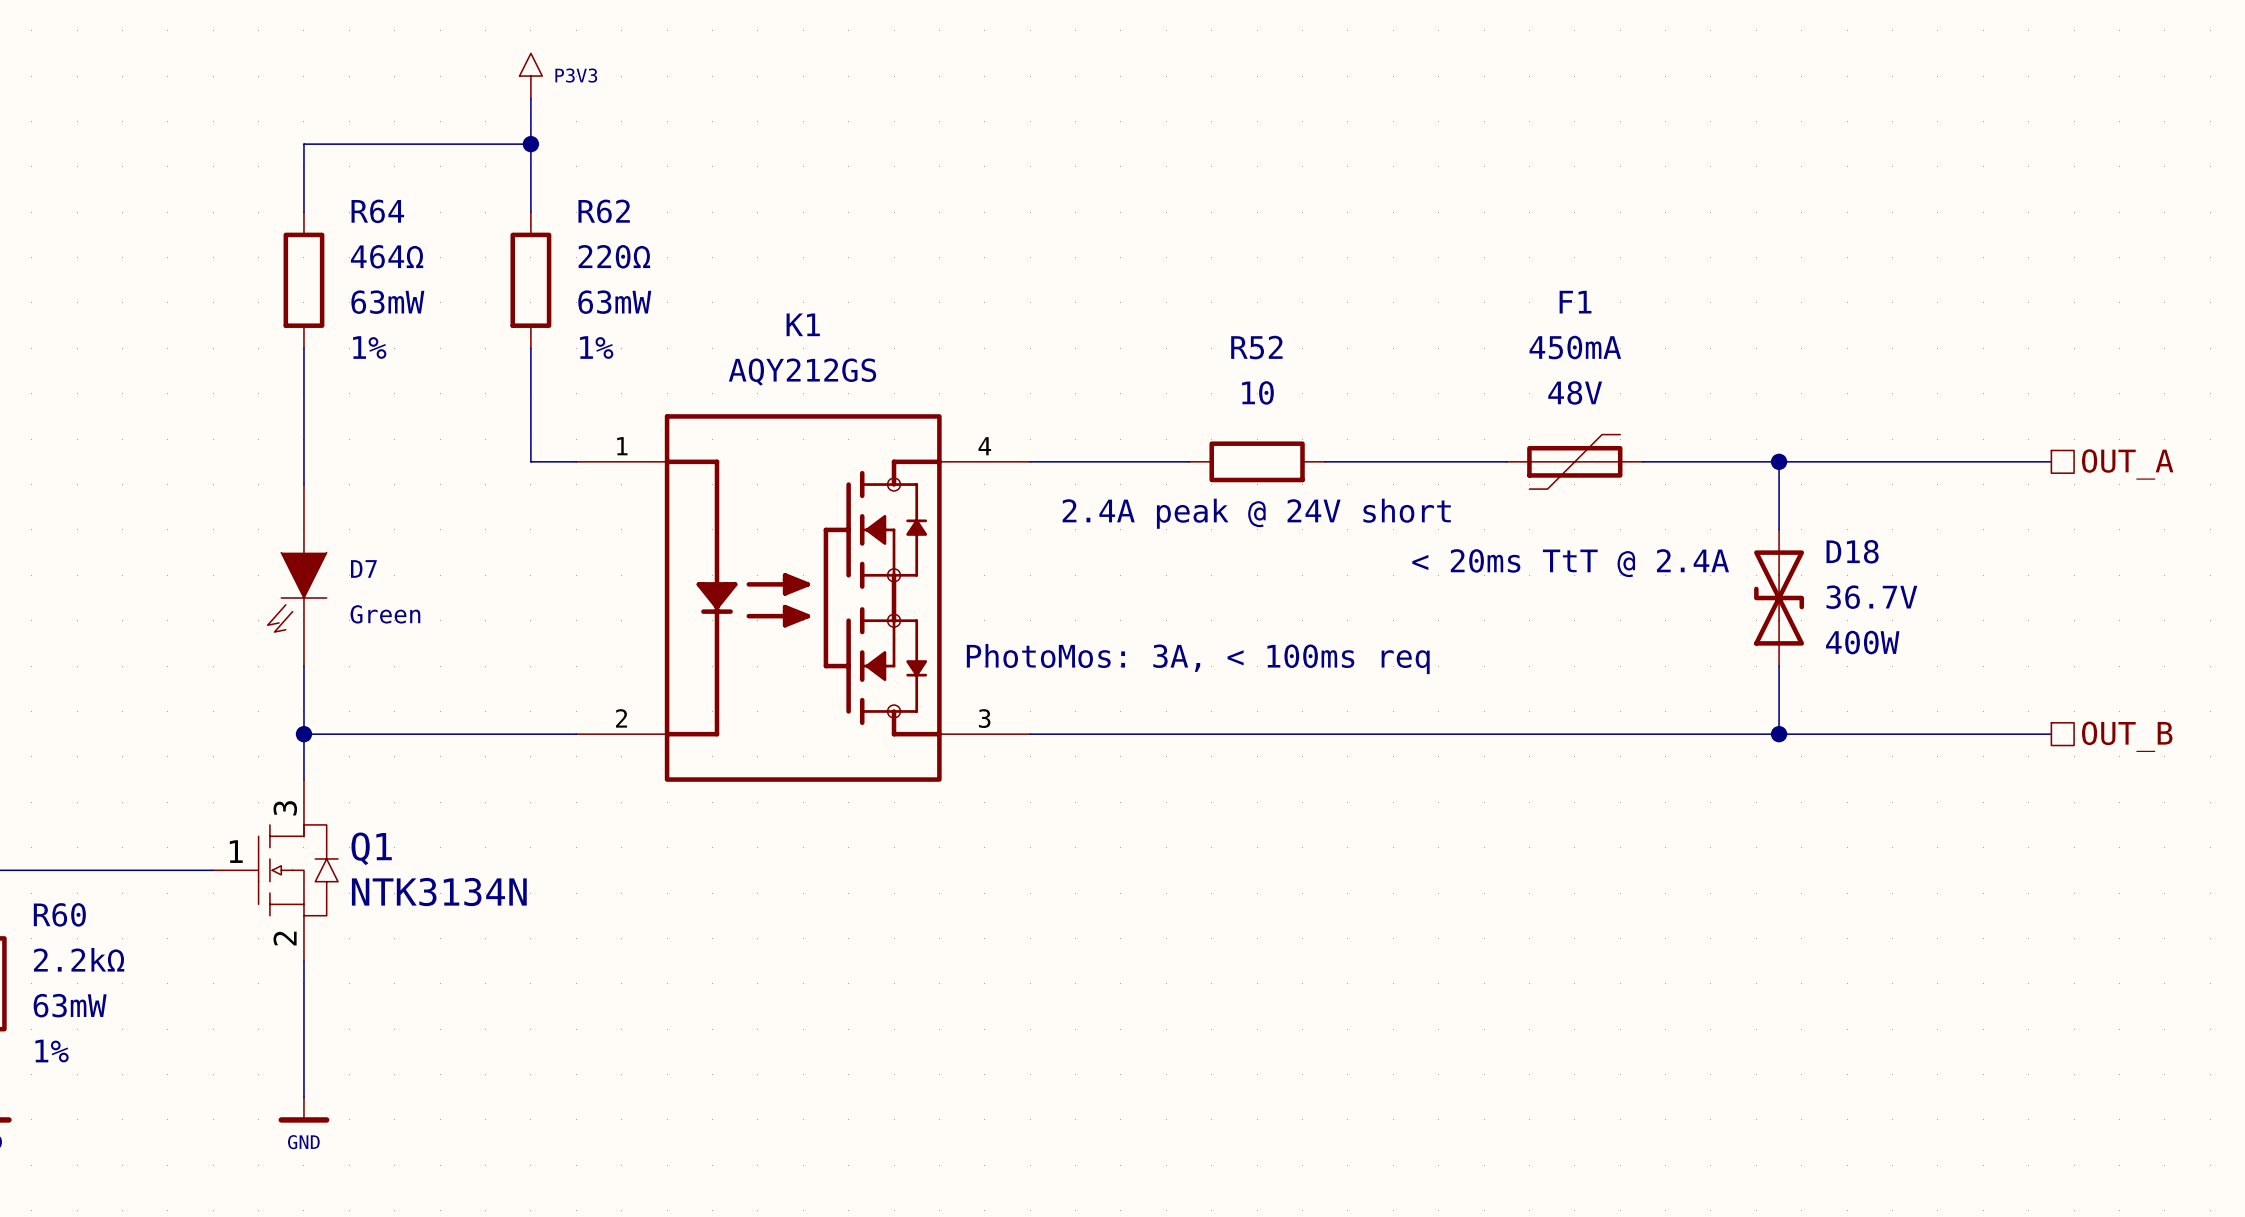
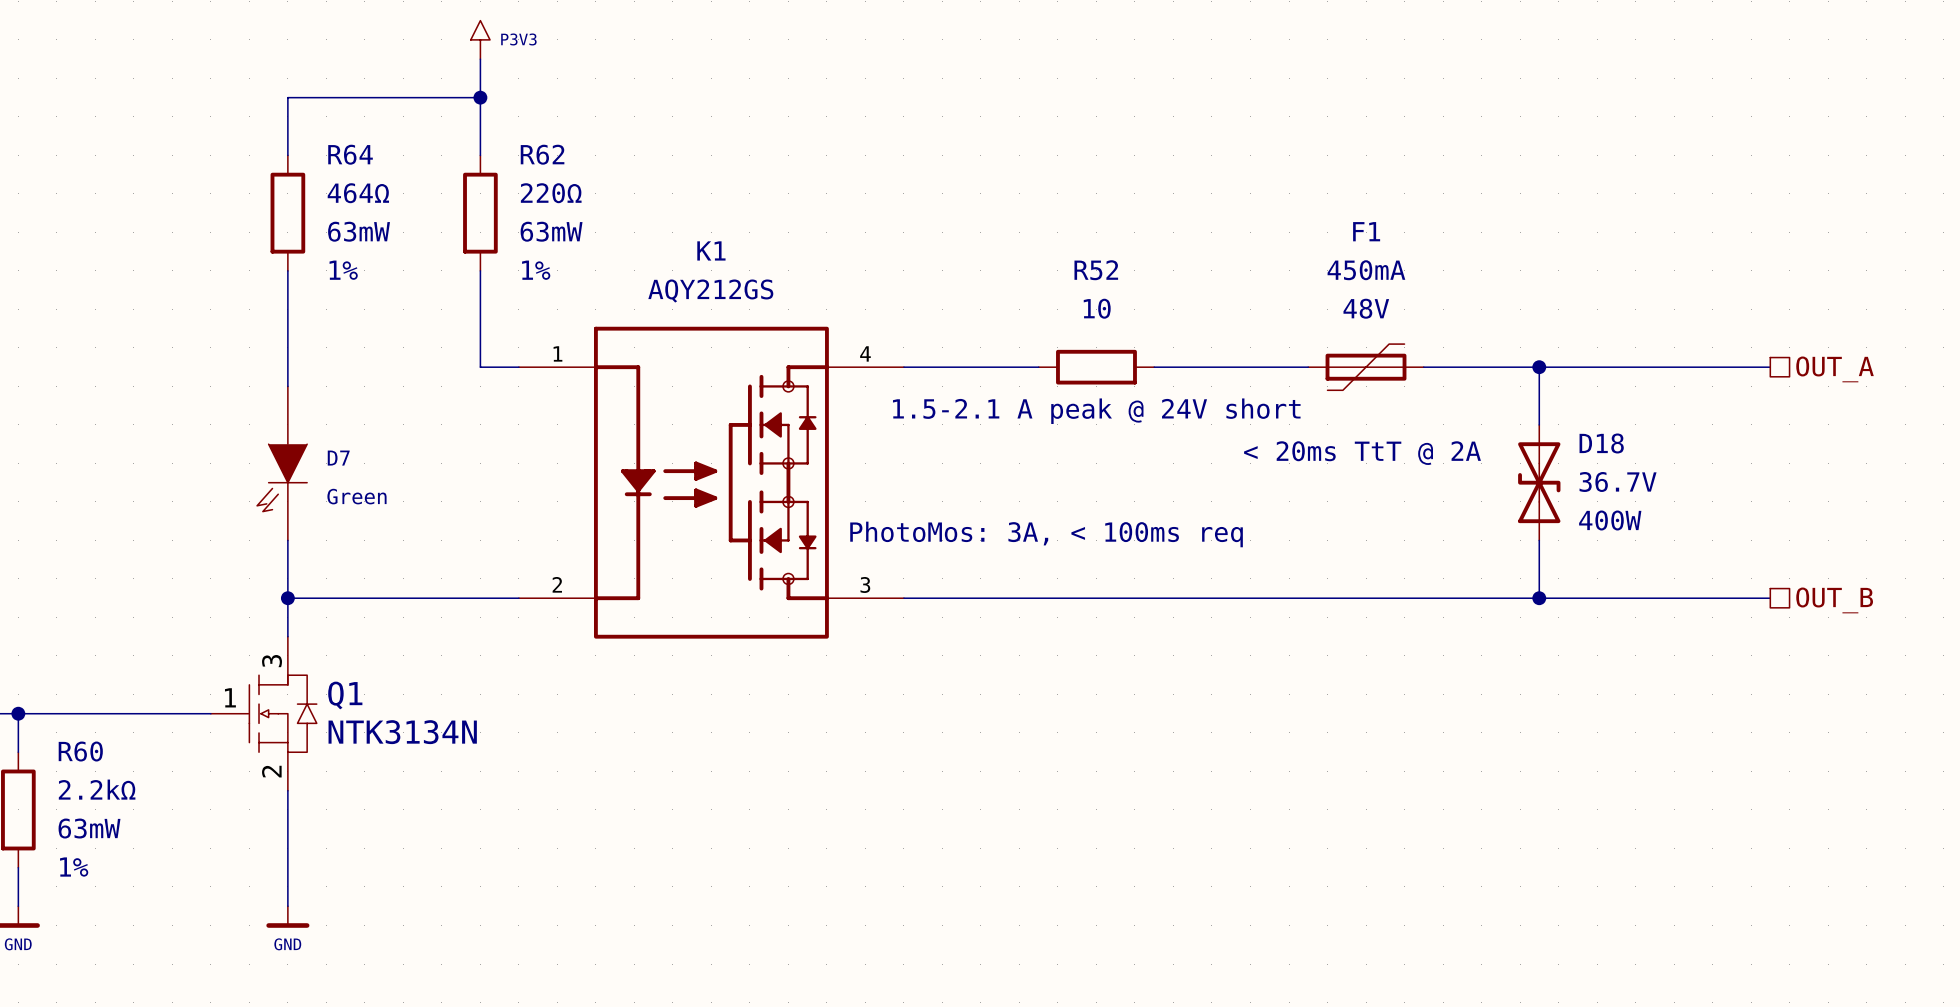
text: 2.4A peak @ 24V short (1256, 513) -> 1.5-2.1 A peak @ 24V short (1096, 411)
text: < 20ms TtT @ 2.4A (1570, 563) -> < 20ms TtT @ 2A (1362, 453)

